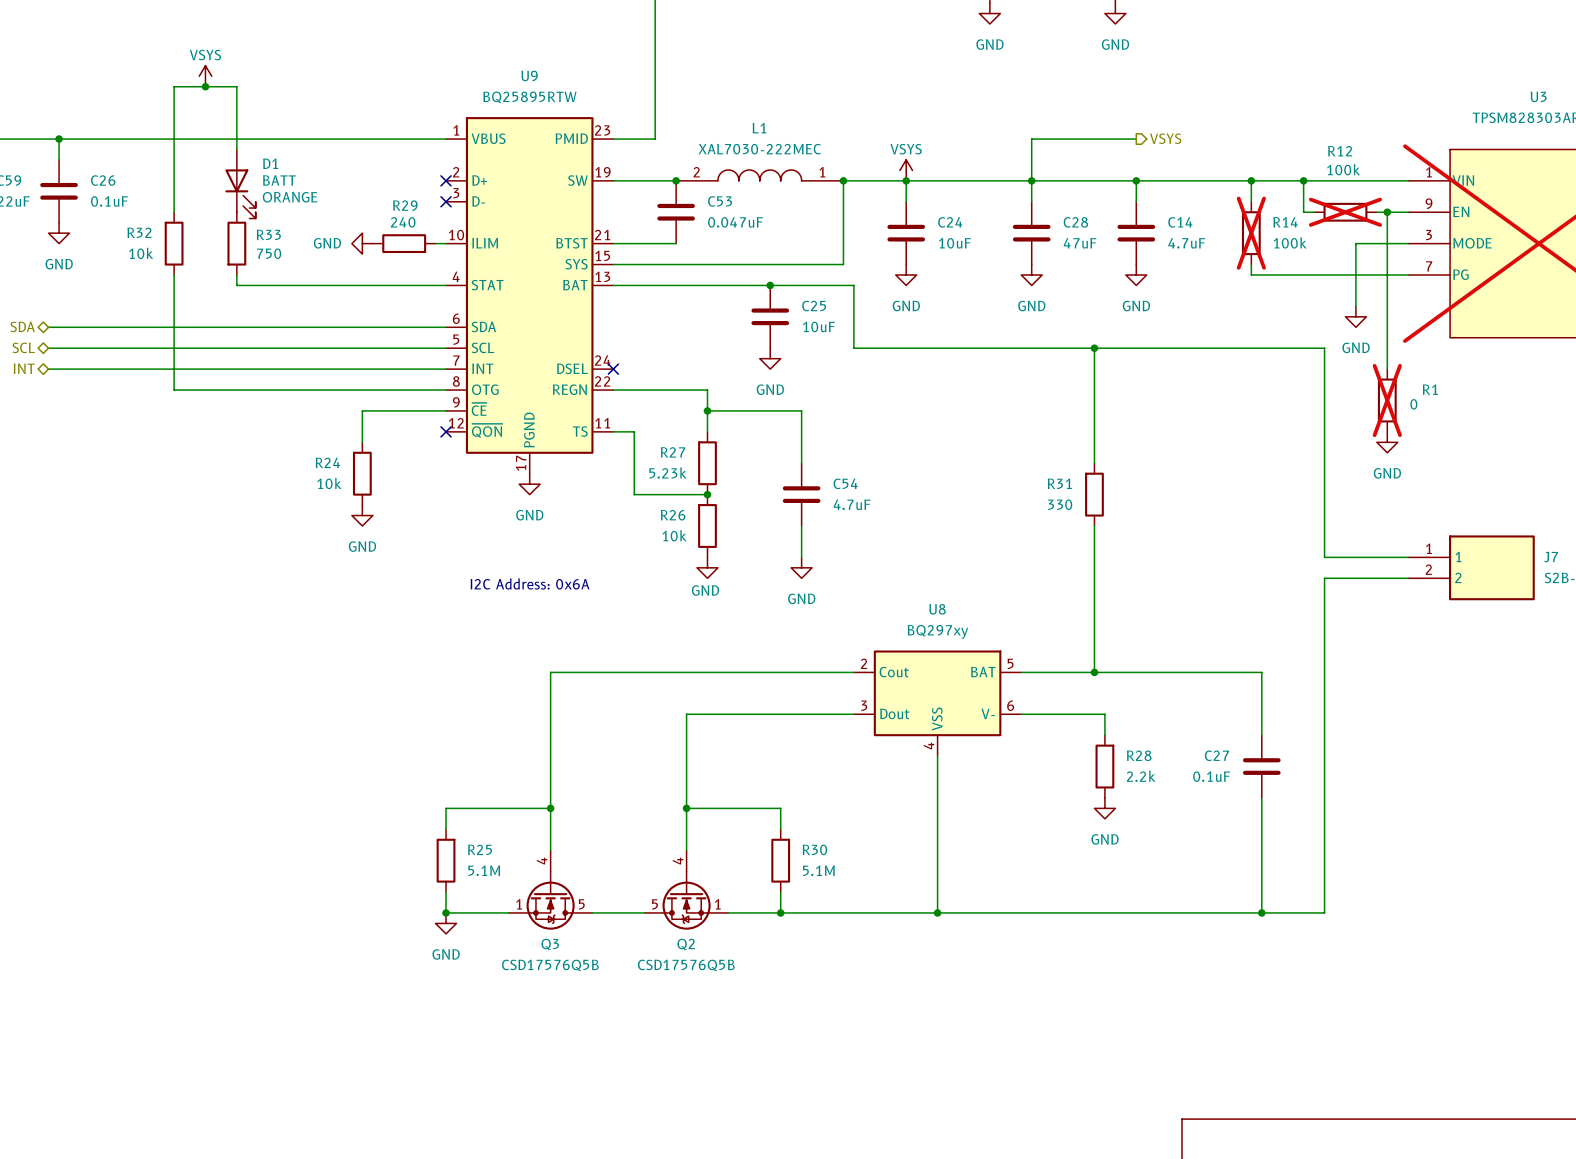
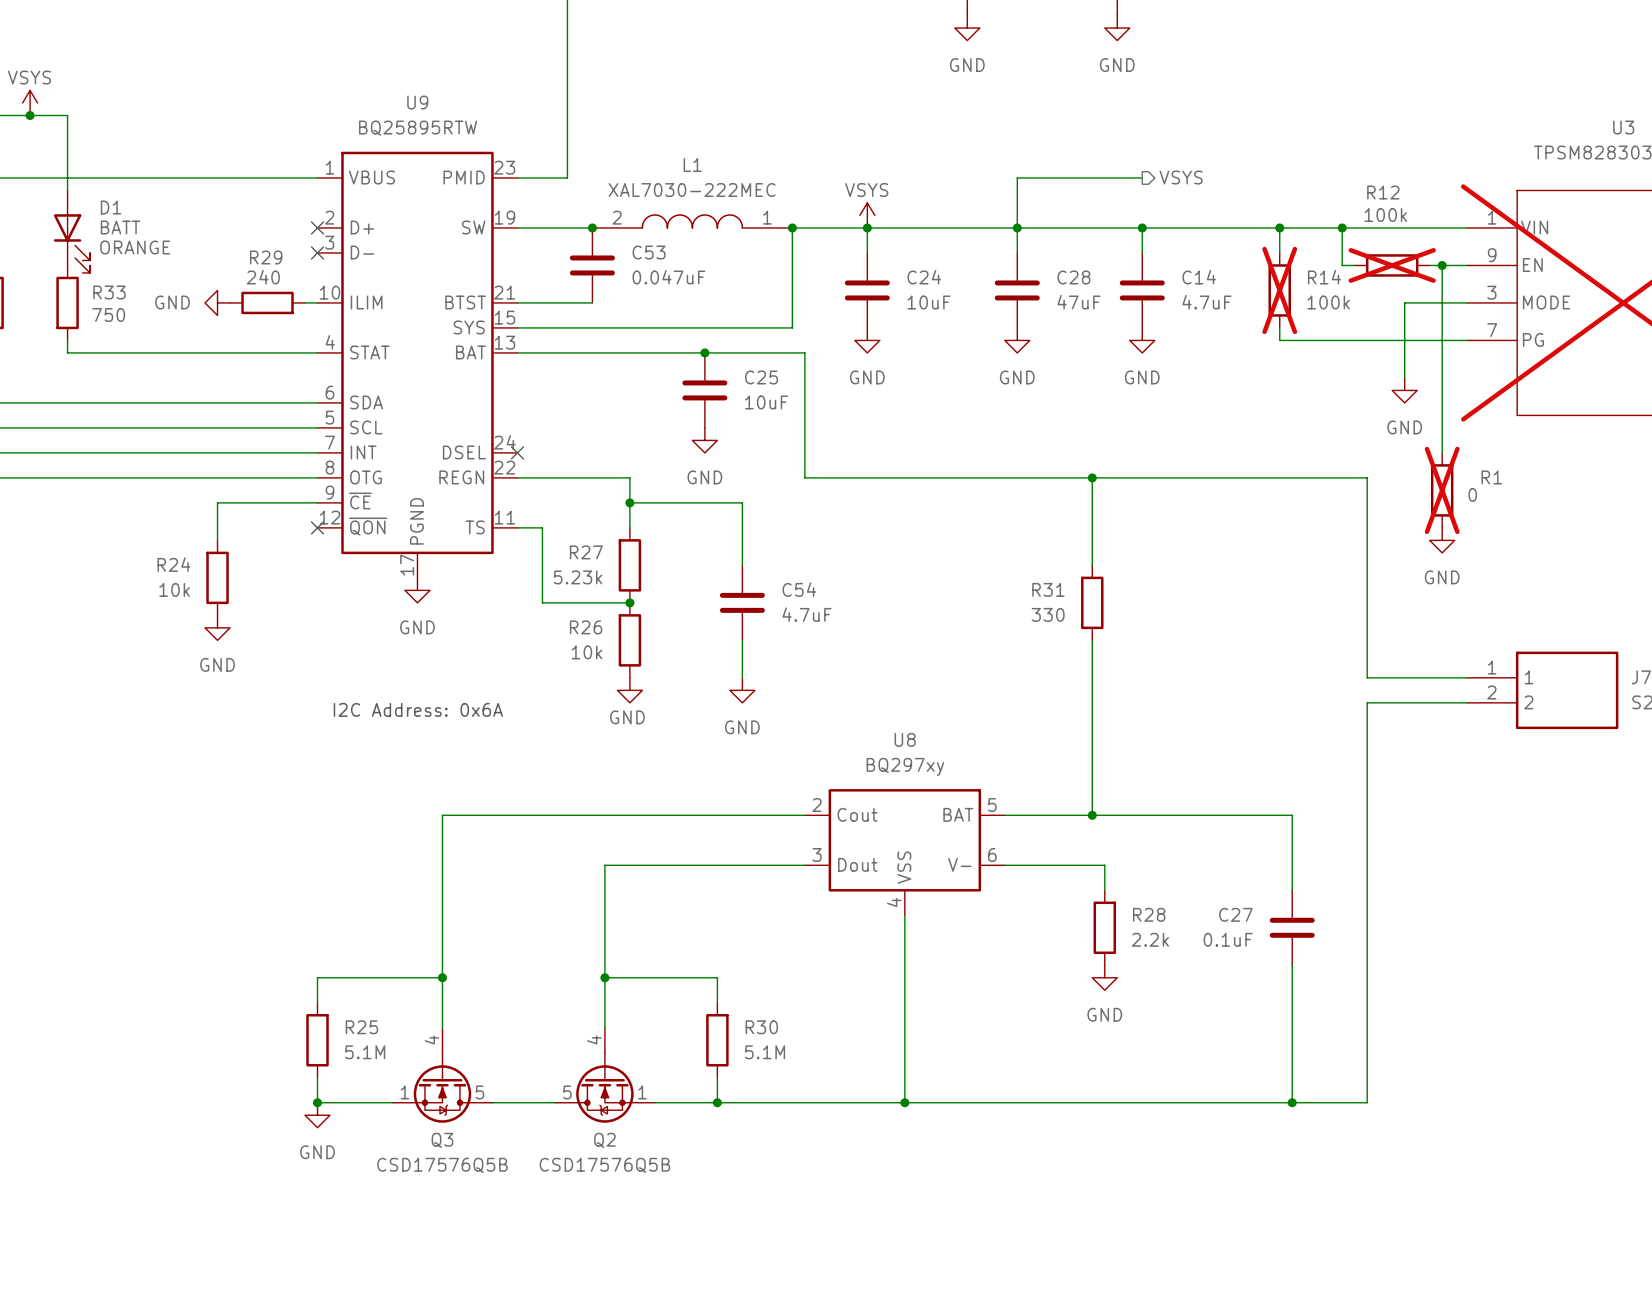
wire: (853, 348) (1324, 348) (1324, 390) -> (804, 427) (804, 477) (1367, 477)
wire: (1094, 348) (1094, 390) -> none
junction position: (1094, 348) -> (1092, 477)

